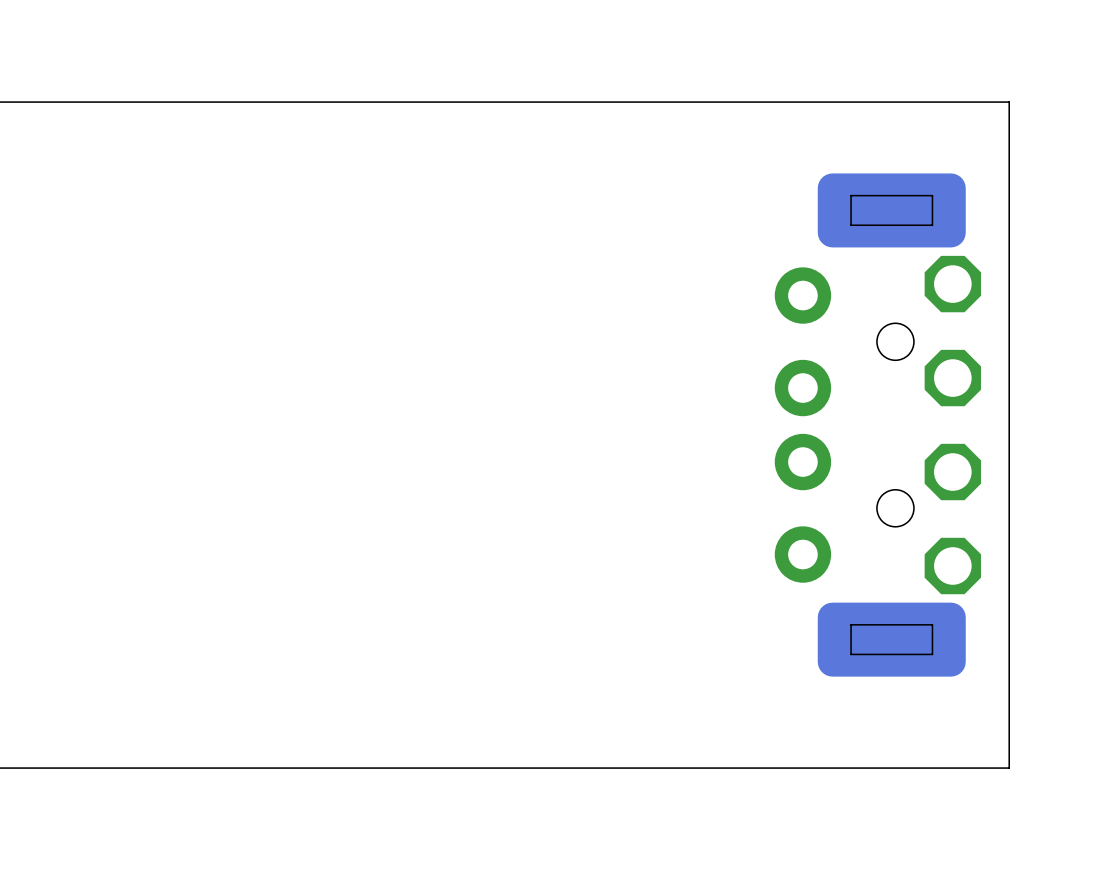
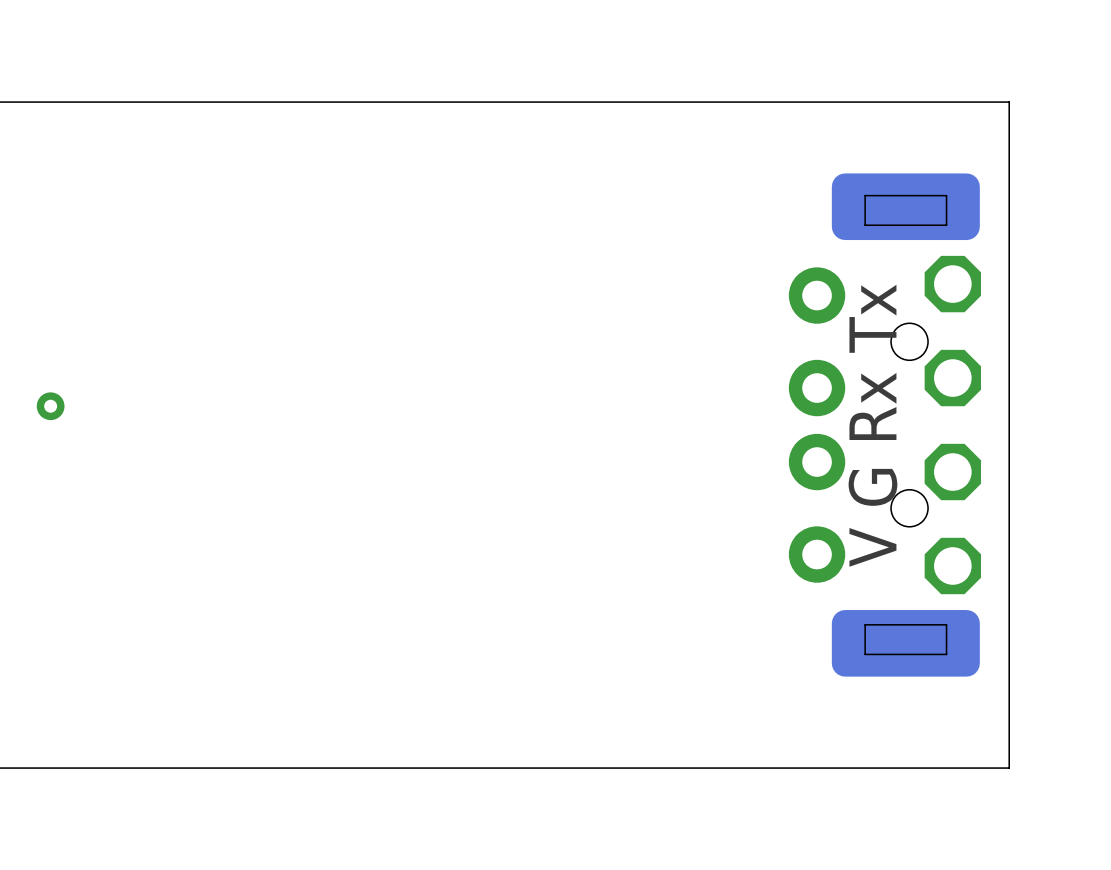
part footprint: [774, 173, 966, 677] -> [788, 173, 980, 677]
via: none -> (50, 406)
part value: none -> V G Rx Tx (872, 425)

